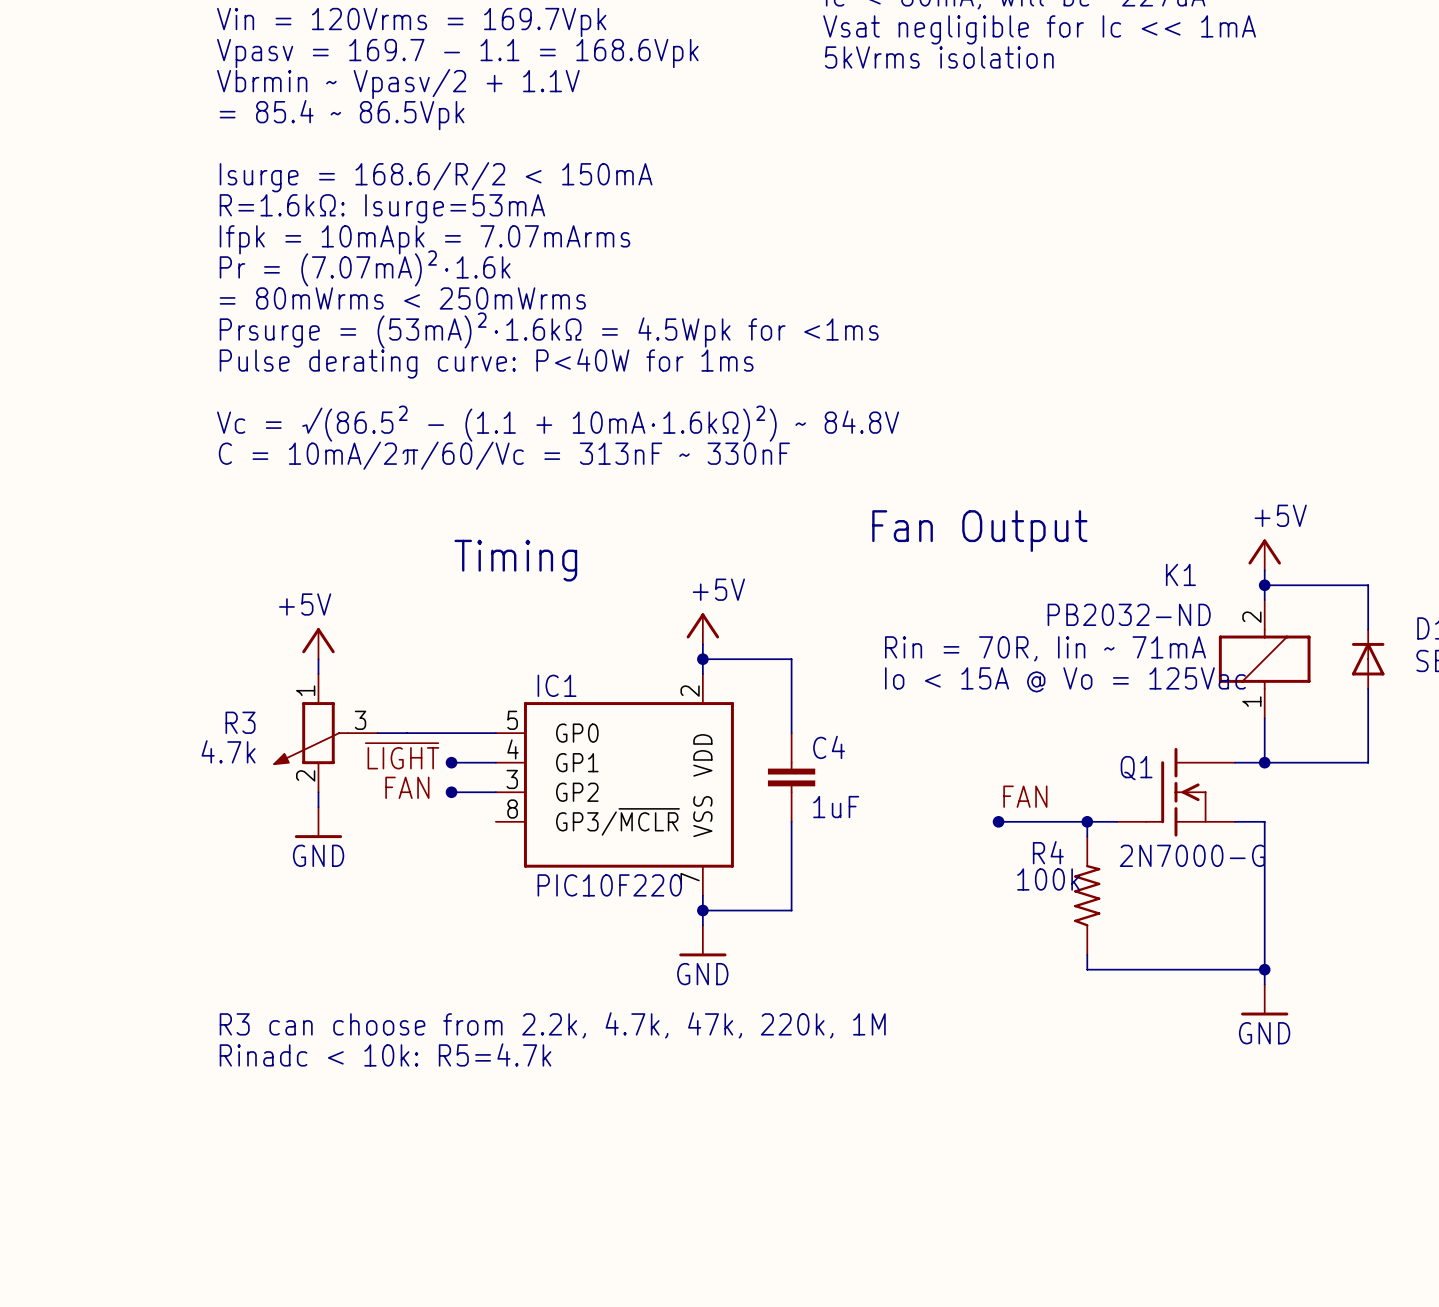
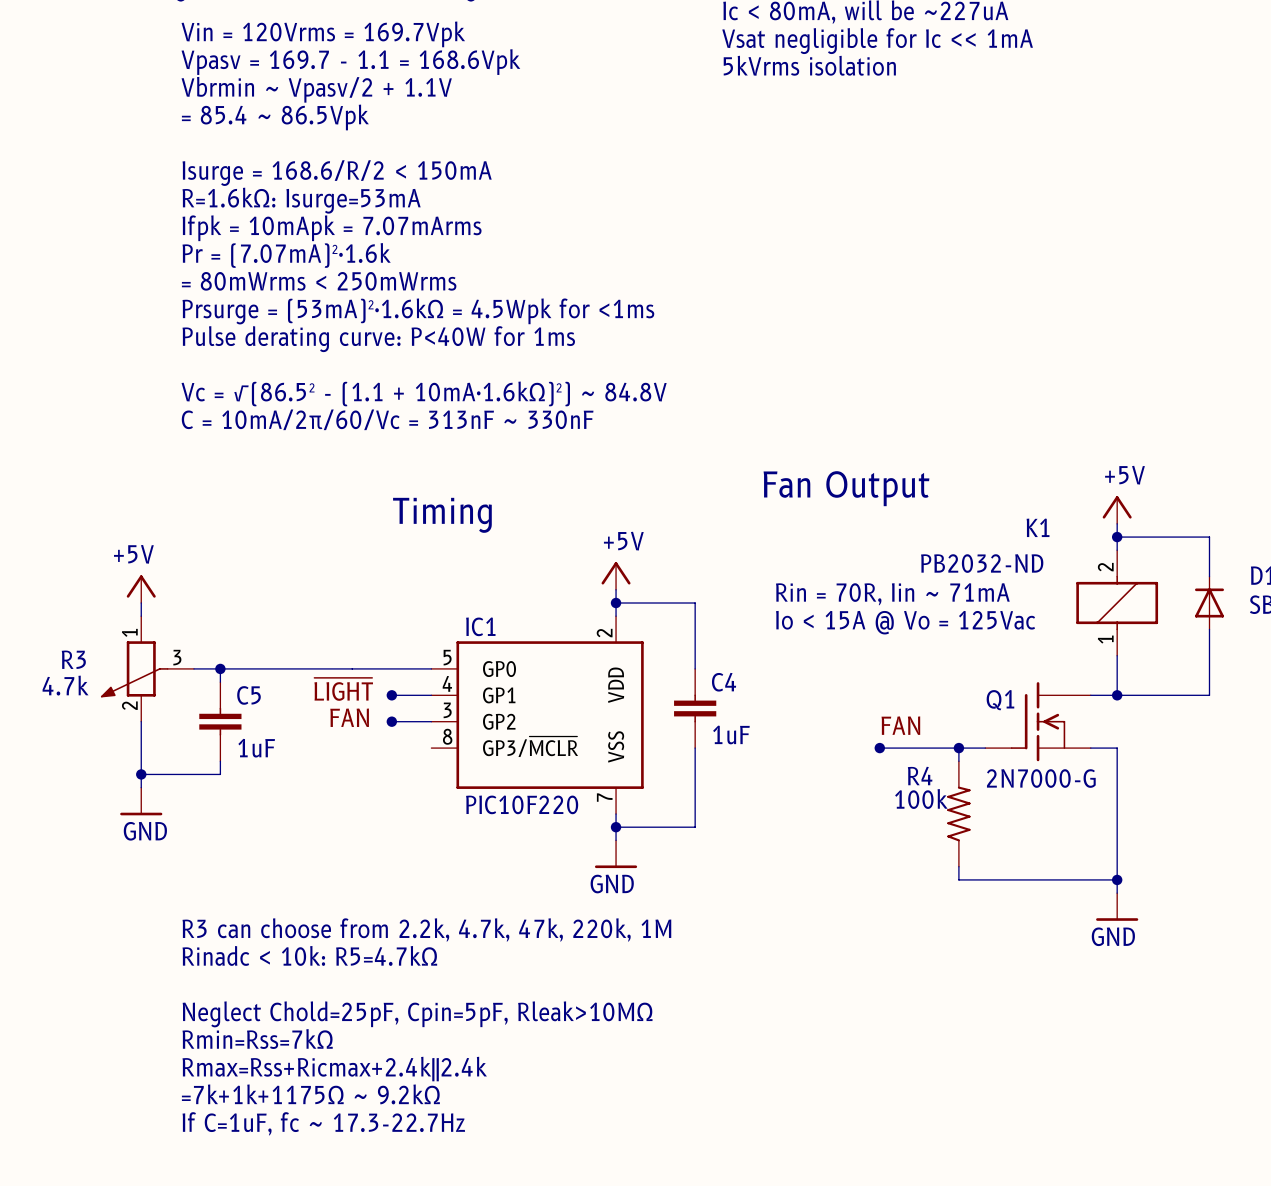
power symbol position: +5V (318, 643) -> +5V (141, 589)
wire: (318, 659) (318, 673) -> (141, 603) (141, 616)
wire: none -> (194, 668) (325, 668)
junction: none -> (220, 668)
R3 position: (325, 733) -> (147, 668)
wire: none -> (141, 721) (141, 787)
C5: none -> 1uF (220, 721)
wire: (318, 792) (318, 807) -> (220, 668) (220, 682)
power symbol position: GND (318, 822) -> GND (141, 801)
wire: none -> (220, 761) (220, 774) (141, 774)
junction: none -> (141, 774)
text: Rinadc < 10k: R5=4.7k (385, 1054) -> Rinadc < 10k: R5=4.7kΩ (309, 955)
text: none -> Neglect Chold=25pF, Cpin=5pF, Rleak>10MΩ (417, 1014)
text: none -> Rmin=Rss=7kΩ (257, 1039)
text: none -> Rmax=Rss+Ricmax+2.4k||2.4k (334, 1069)
text: none -> =7k+1k+1175Ω ~ 9.2kΩ (310, 1094)
text: none -> If C=1uF, fc ~ 17.3-22.7Hz (323, 1123)

